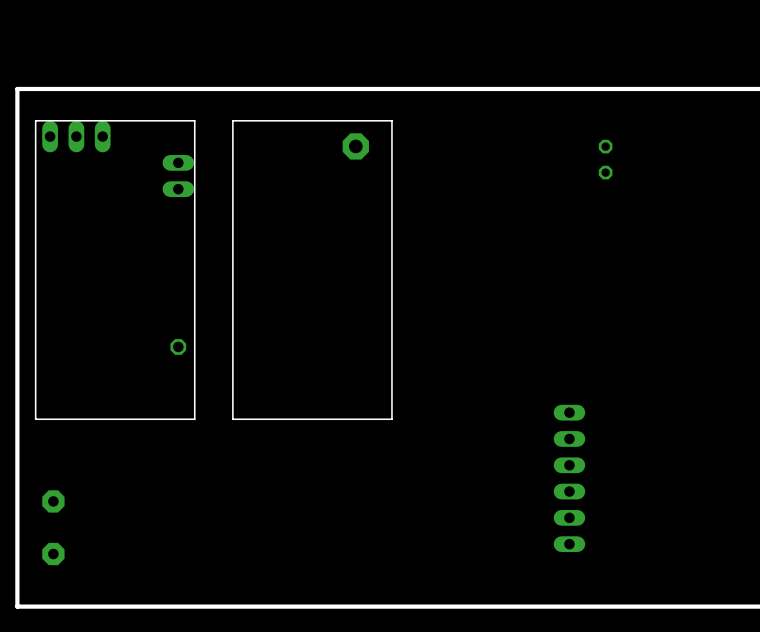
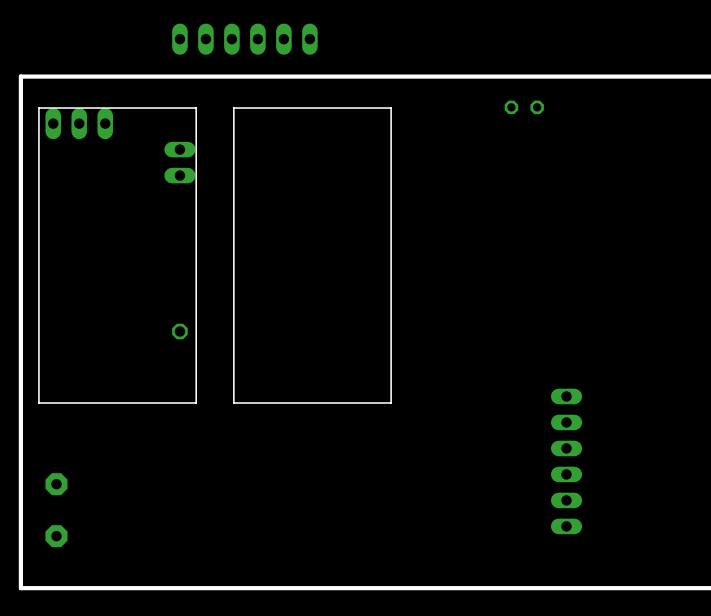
part: none -> (244, 39)
part: (355, 146) -> none
part rotation: 0° (605, 159) -> 90° clockwise (524, 107)
part position: (605, 159) -> (524, 107)

